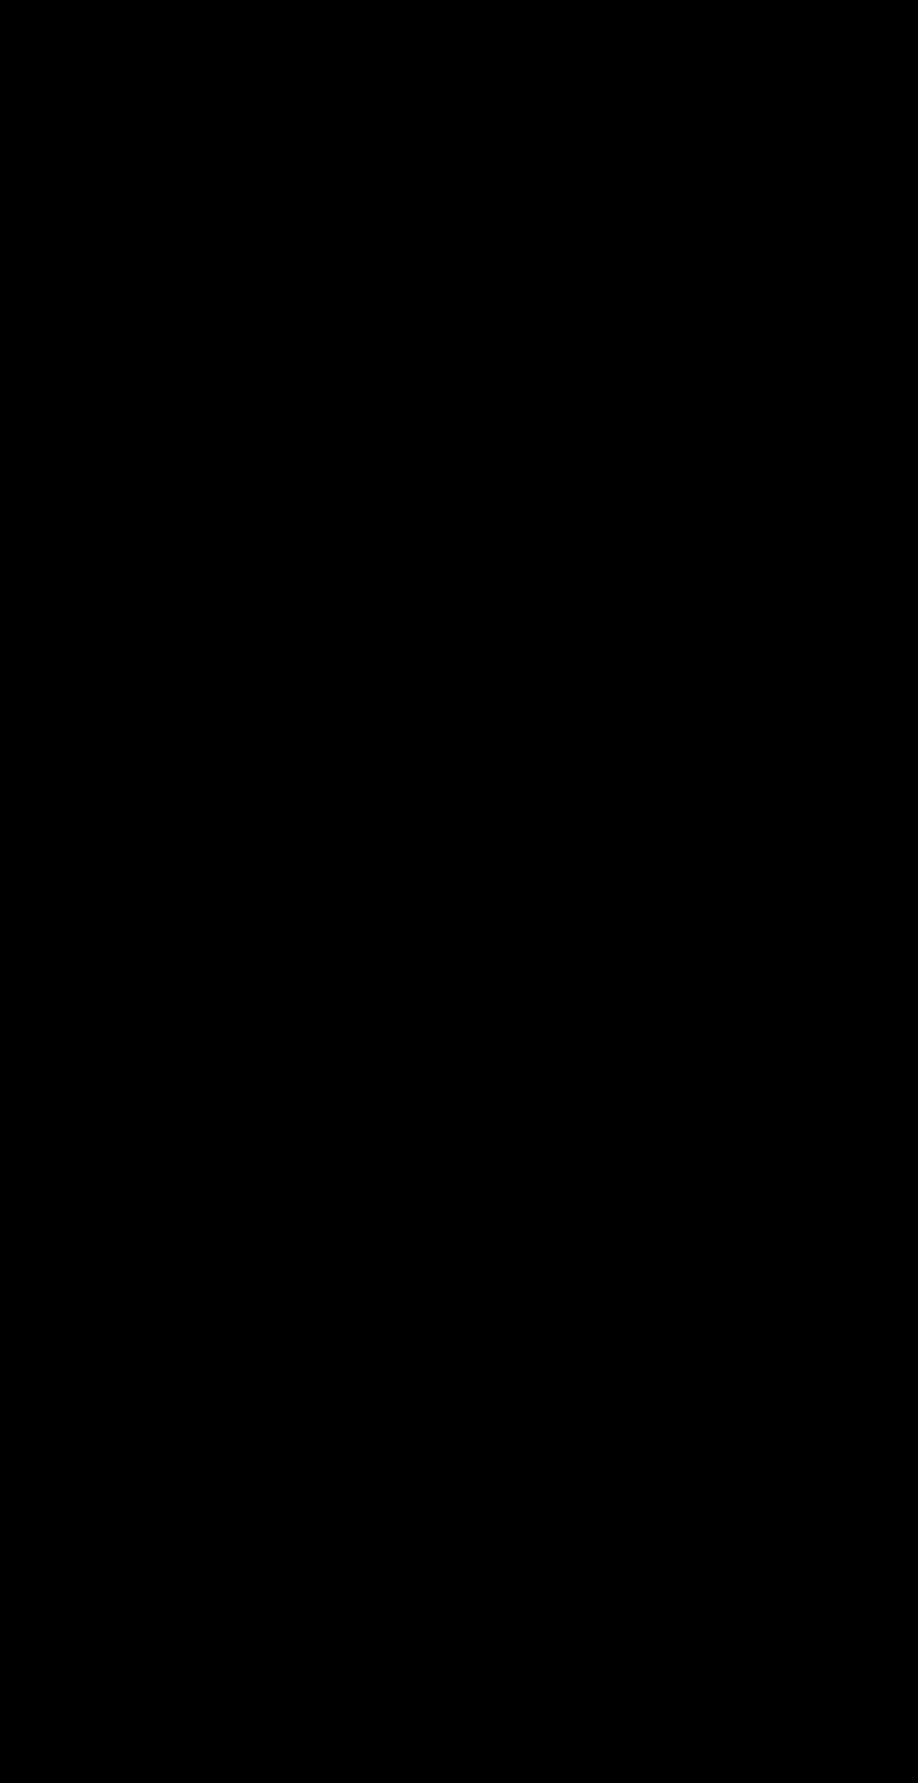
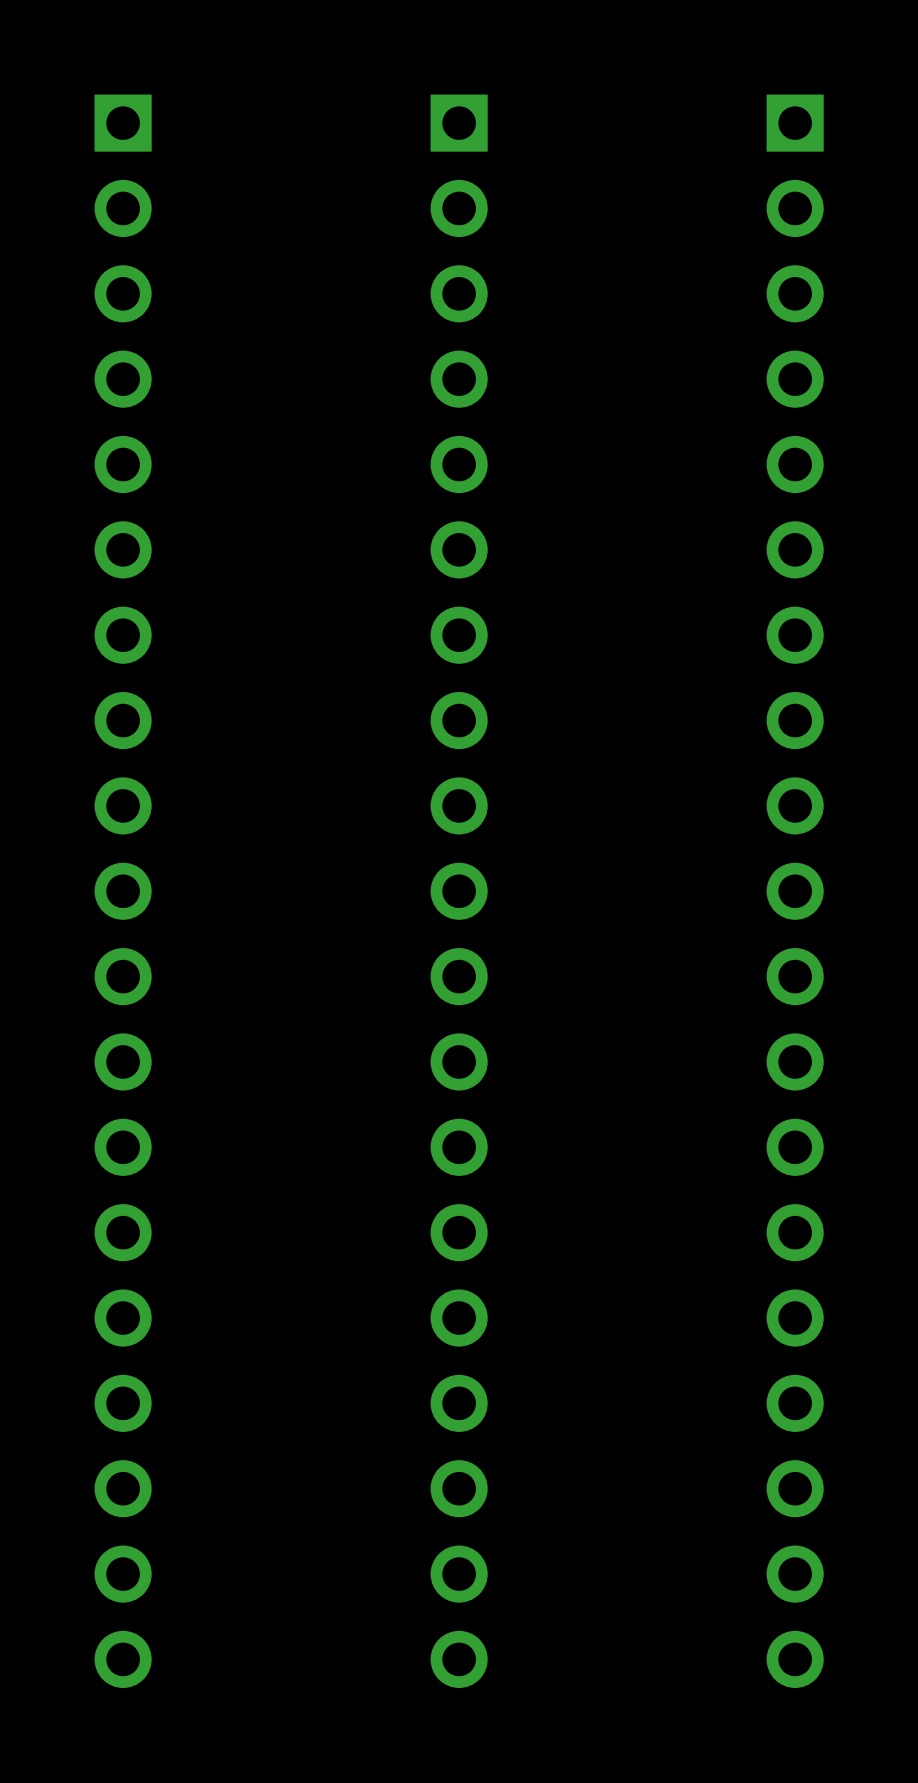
part: none -> (123, 891)
part: none -> (459, 891)
part: none -> (795, 891)

